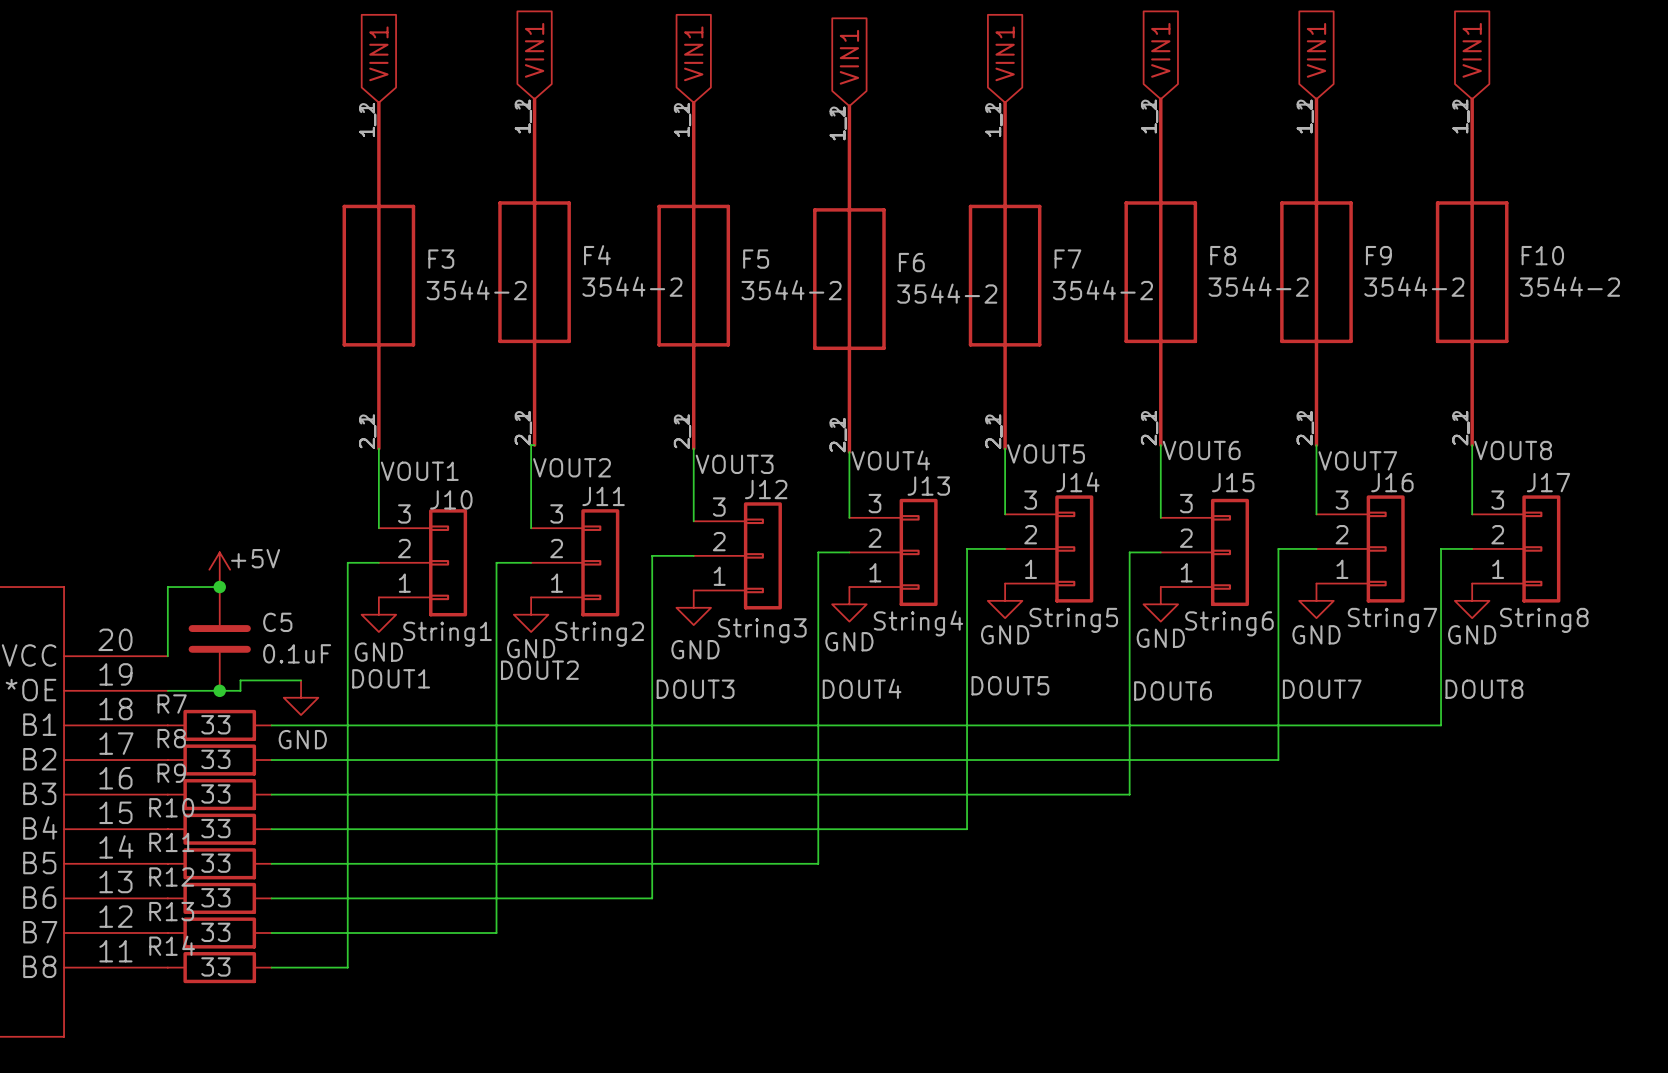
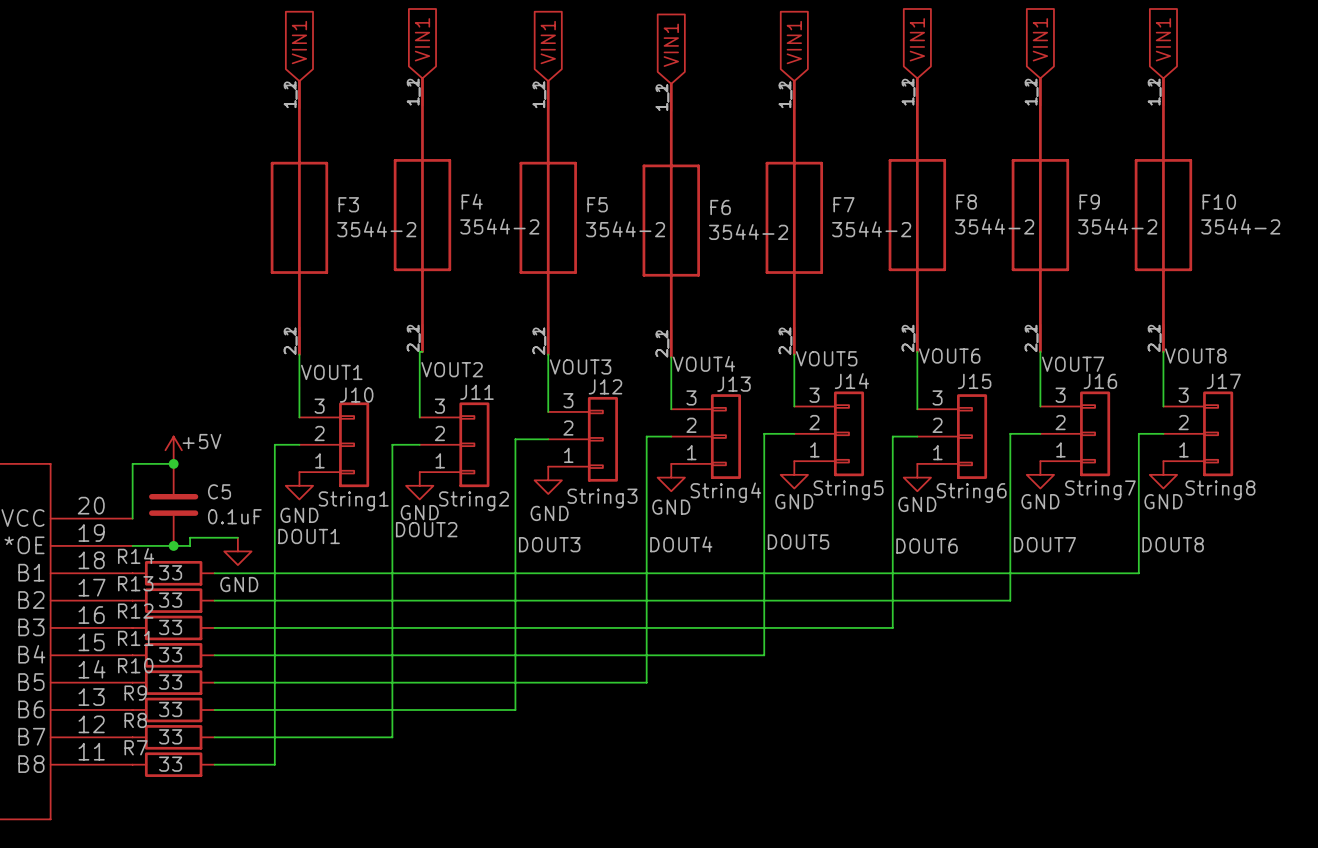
R7 name: R7 (172, 704) -> R14 (136, 556)
R8 name: R8 (171, 738) -> R13 (135, 583)
R9 name: R9 (171, 773) -> R12 (135, 611)
R10 name: R10 (171, 807) -> R11 (135, 638)
R11 name: R11 (171, 842) -> R10 (135, 665)
R12 name: R12 (171, 876) -> R9 (135, 693)
R13 name: R13 (171, 911) -> R8 (135, 720)
R14 name: R14 (172, 945) -> R7 (136, 747)

